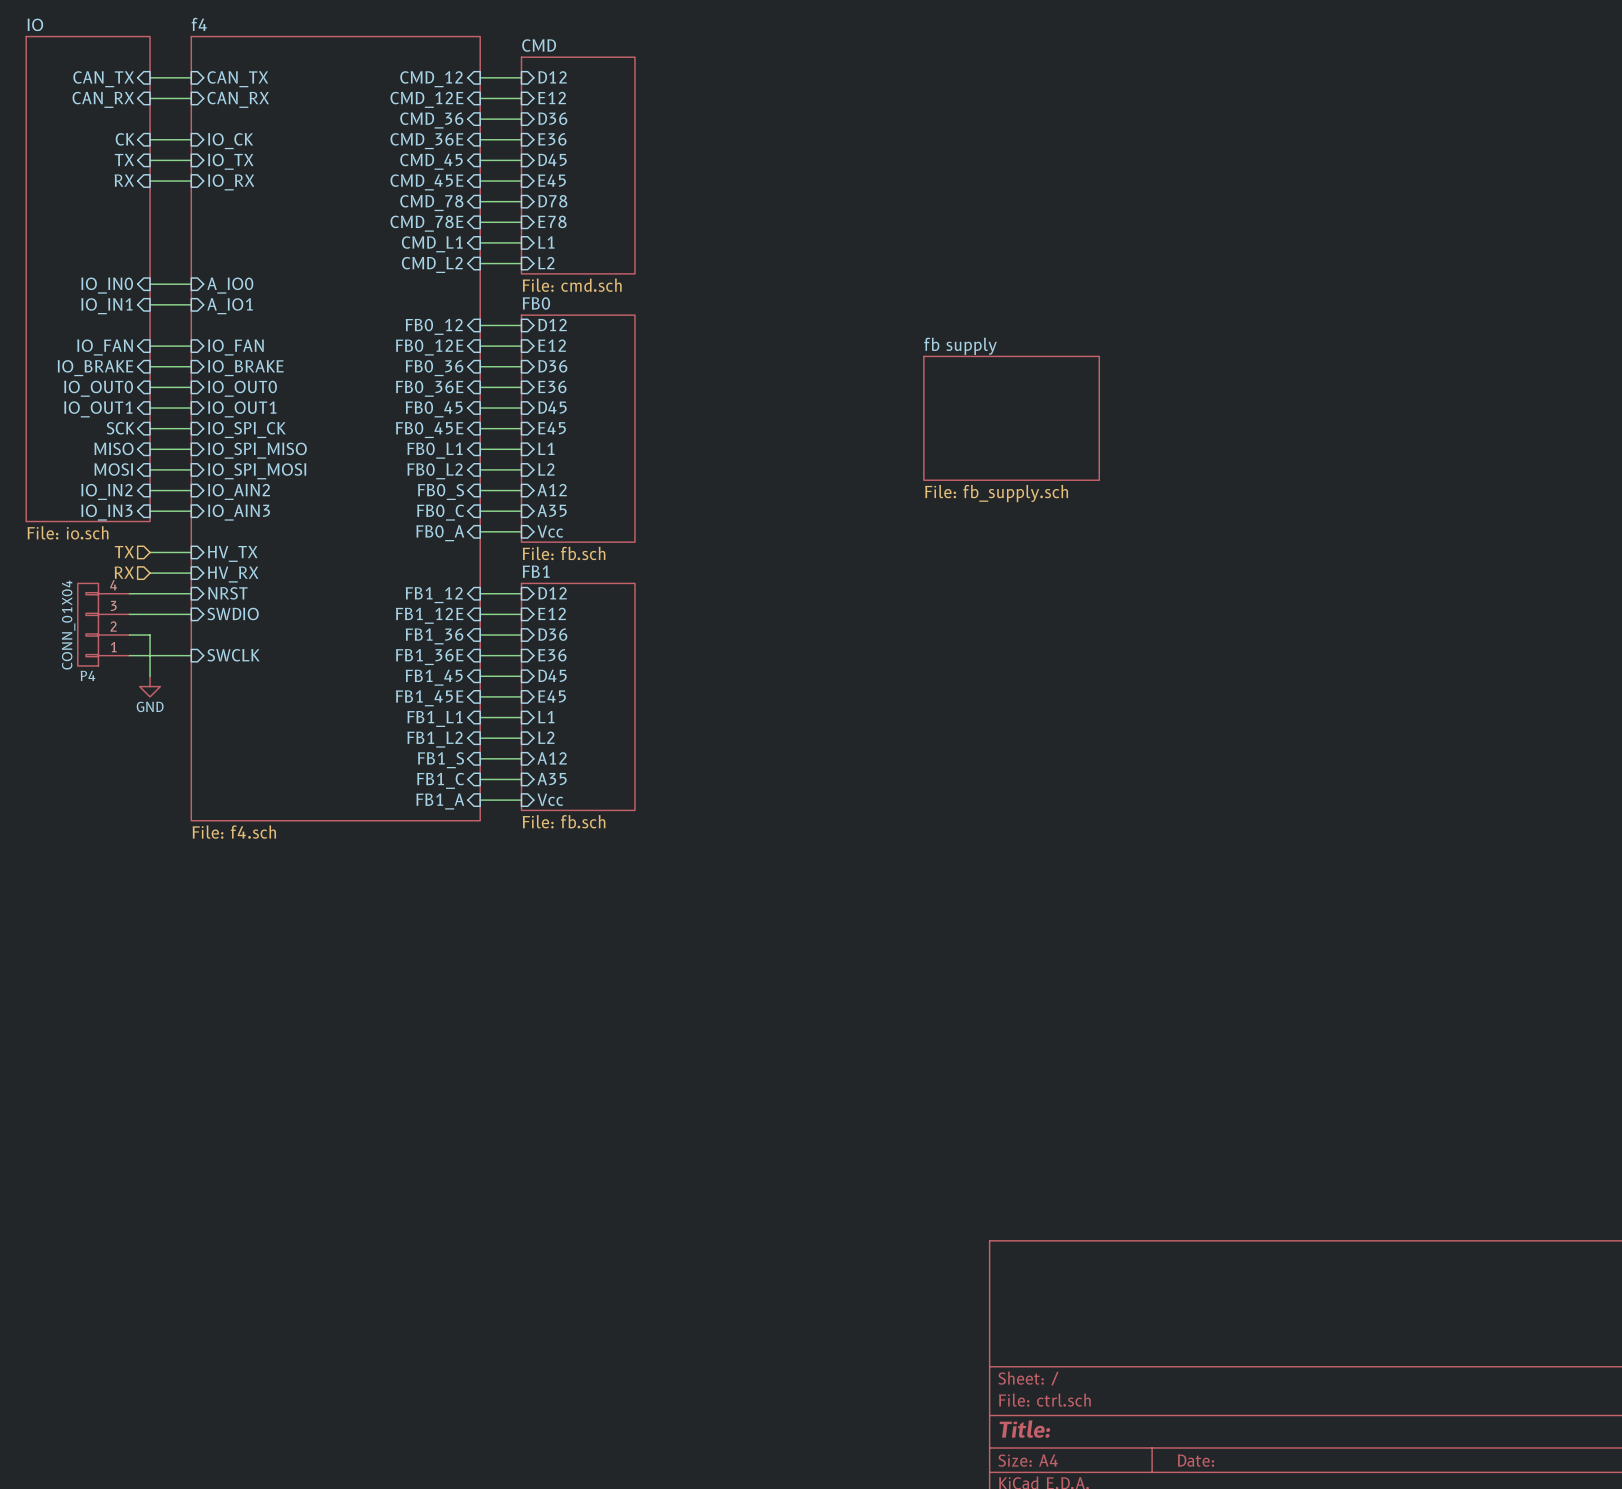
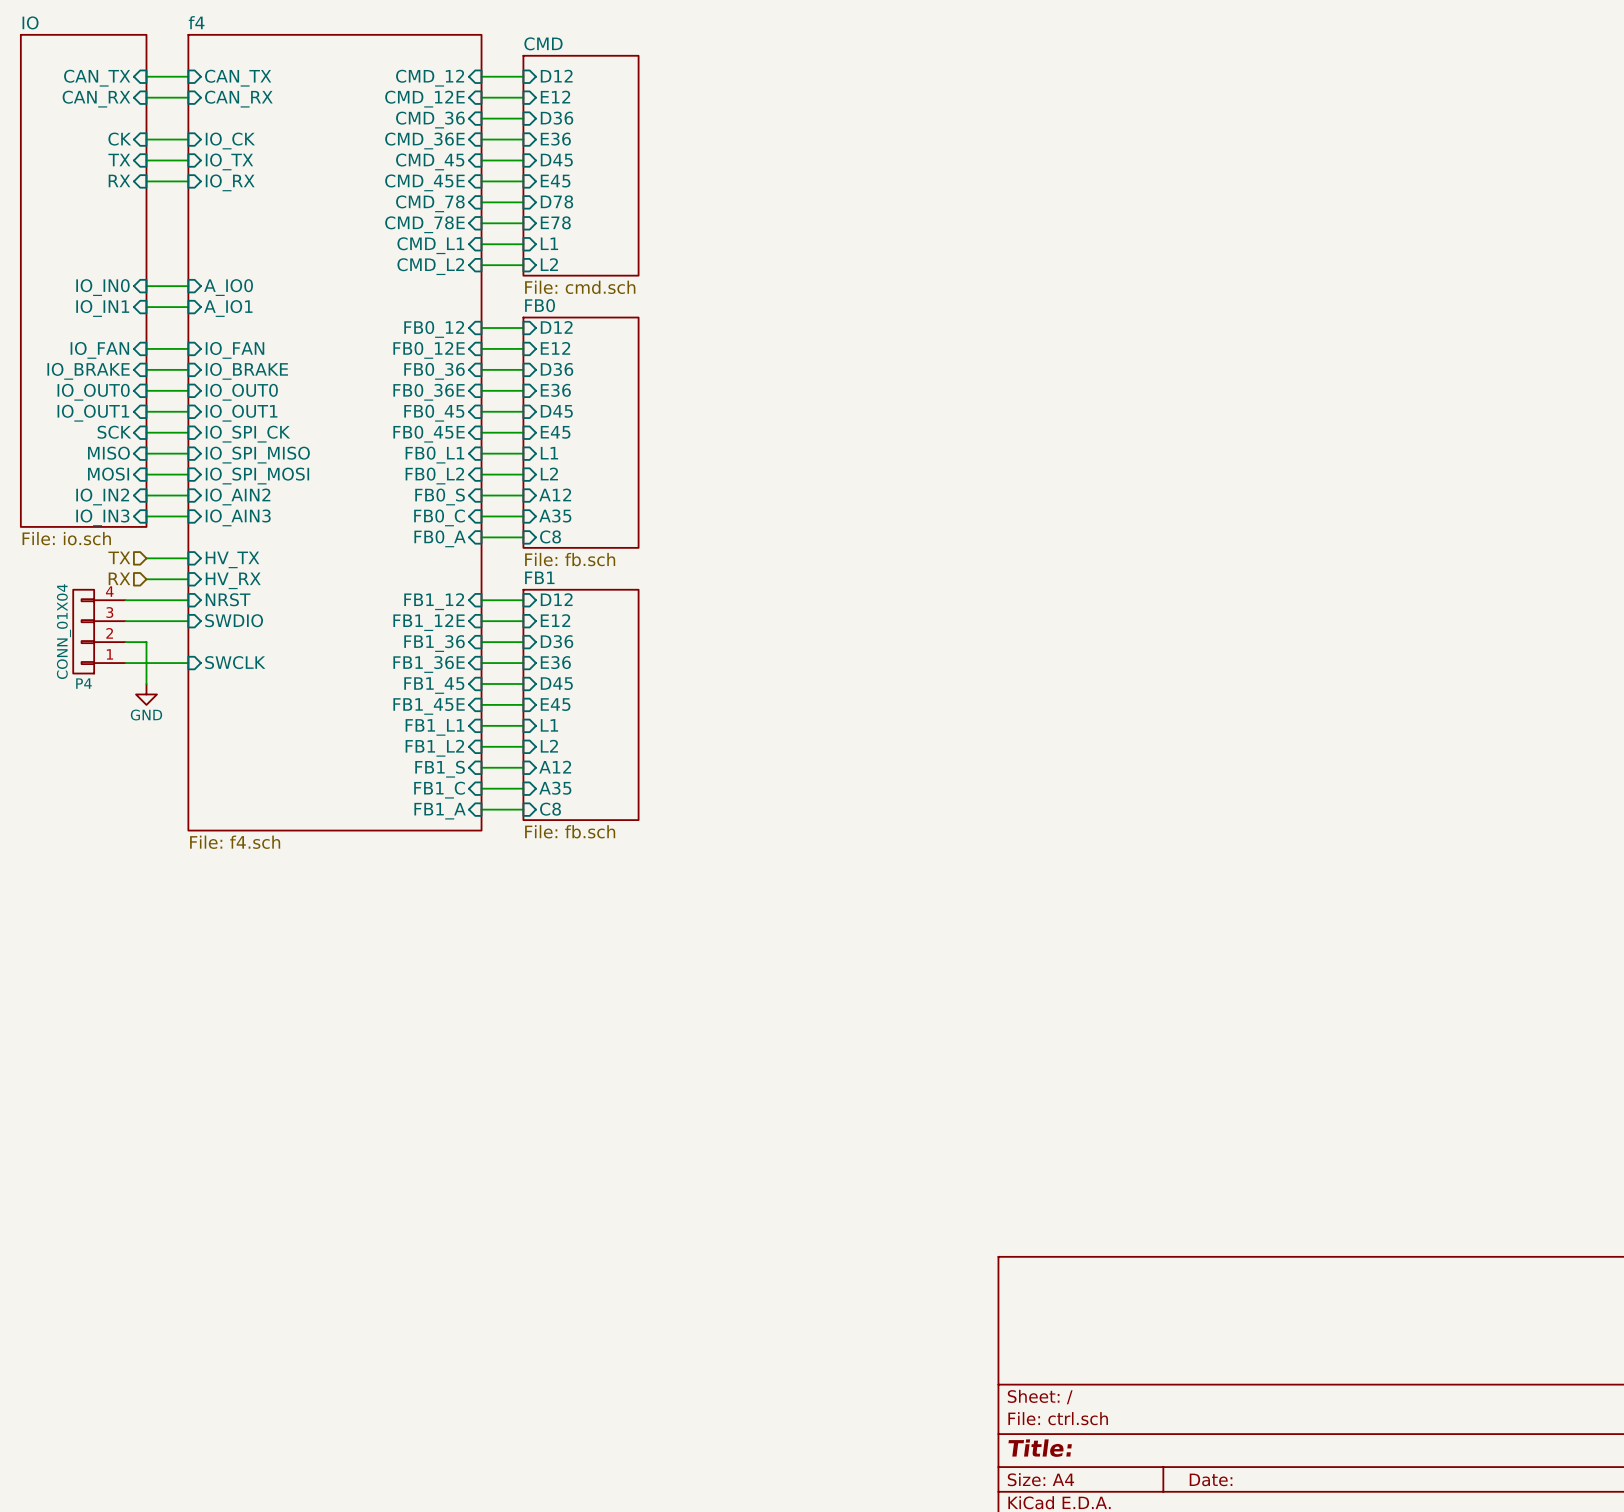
sheet fb supply: File: fb_supply.sch (1011, 418) -> none
sheet pin: Vcc (550, 531) -> C8 (550, 536)
sheet pin: Vcc (550, 799) -> C8 (550, 809)

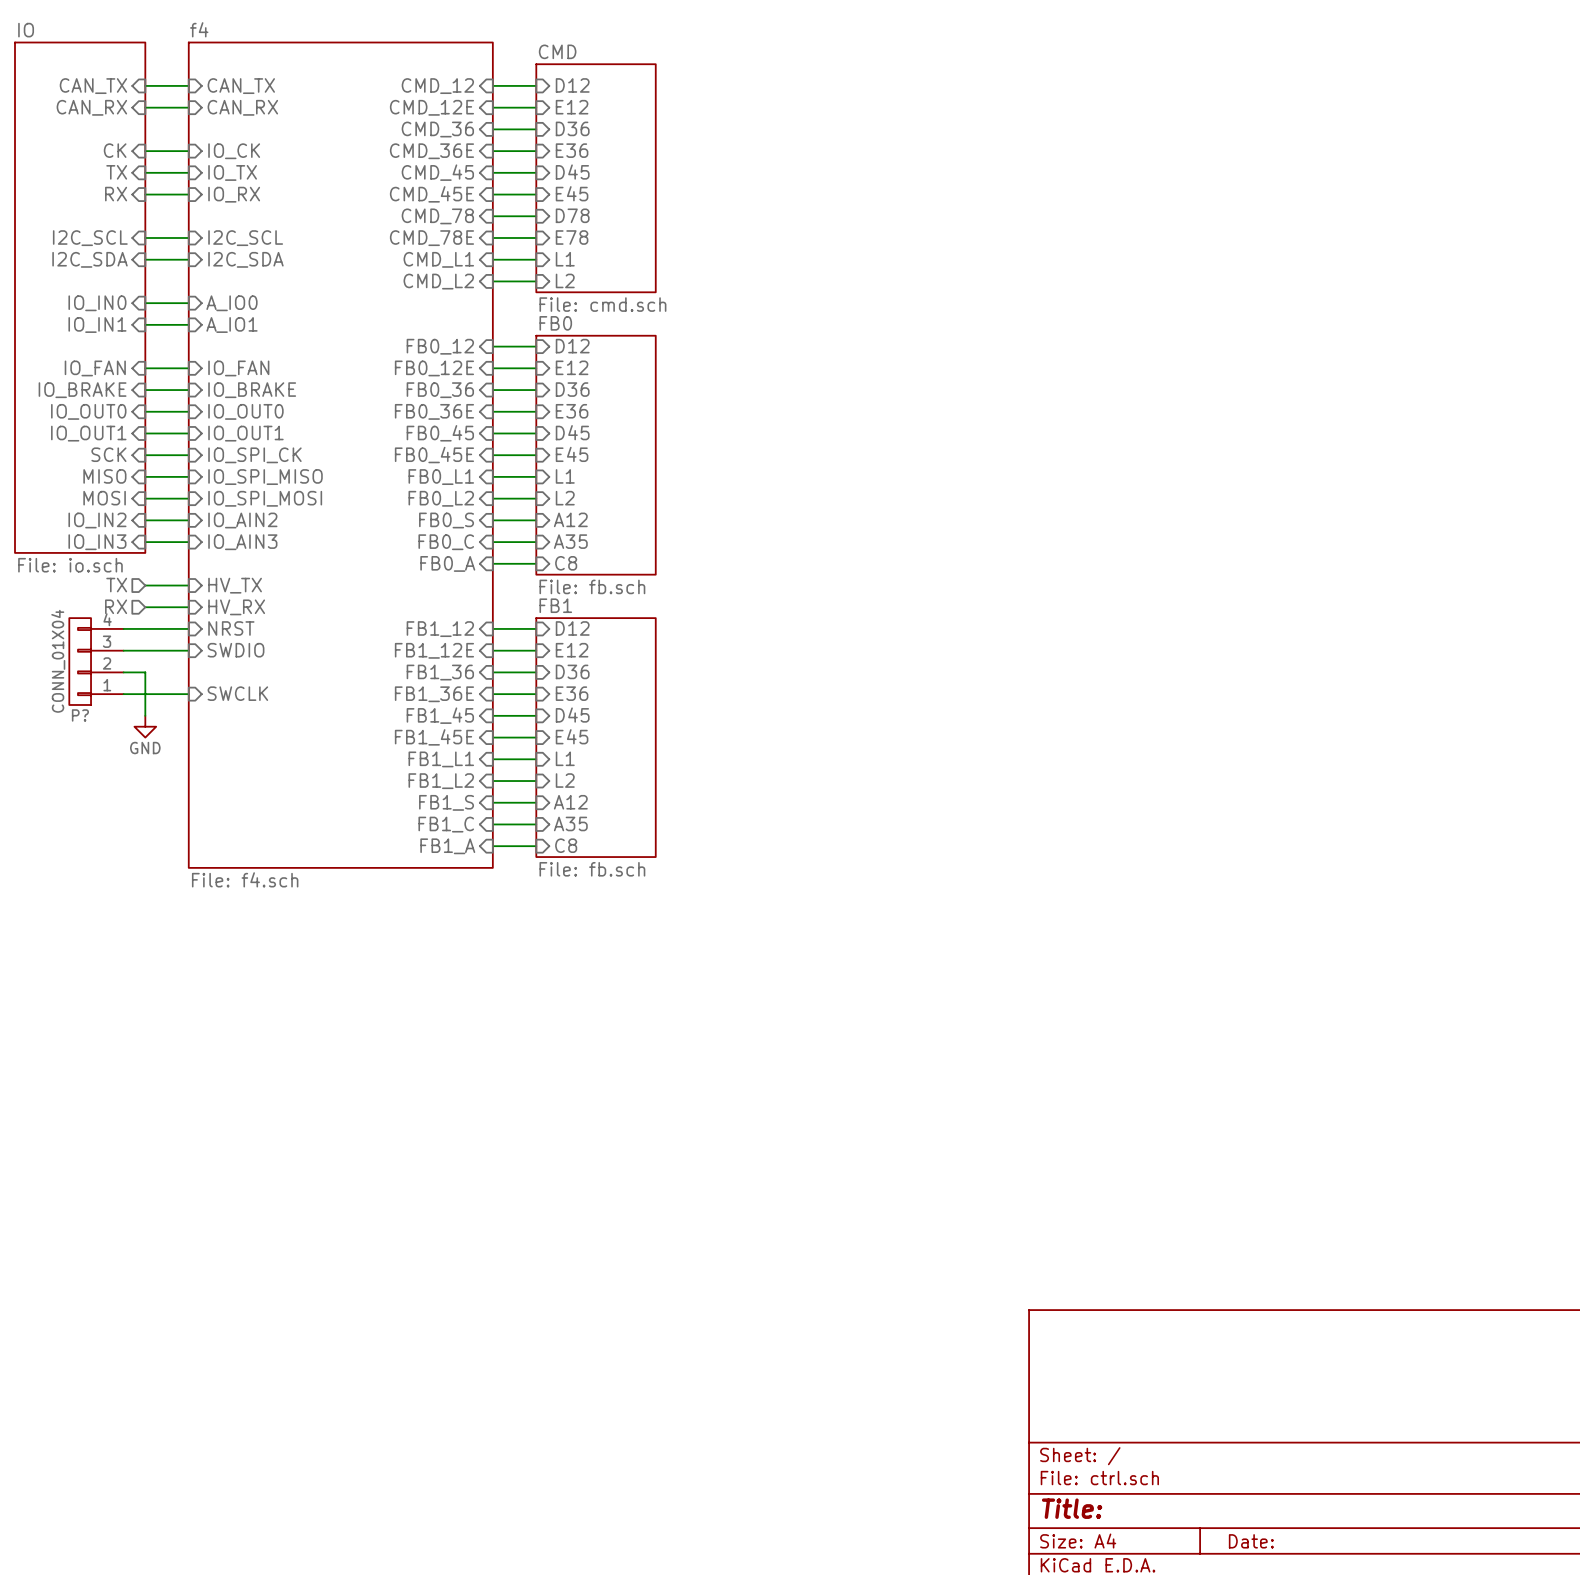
wire: none -> (145, 237) (188, 237)
sheet pin: none -> I2C_SCL (90, 238)
sheet pin: none -> I2C_SCL (245, 238)
wire: none -> (145, 259) (188, 259)
sheet pin: none -> I2C_SDA (90, 259)
sheet pin: none -> I2C_SDA (245, 259)
P4 name: P4 (83, 683) -> P? (80, 715)

